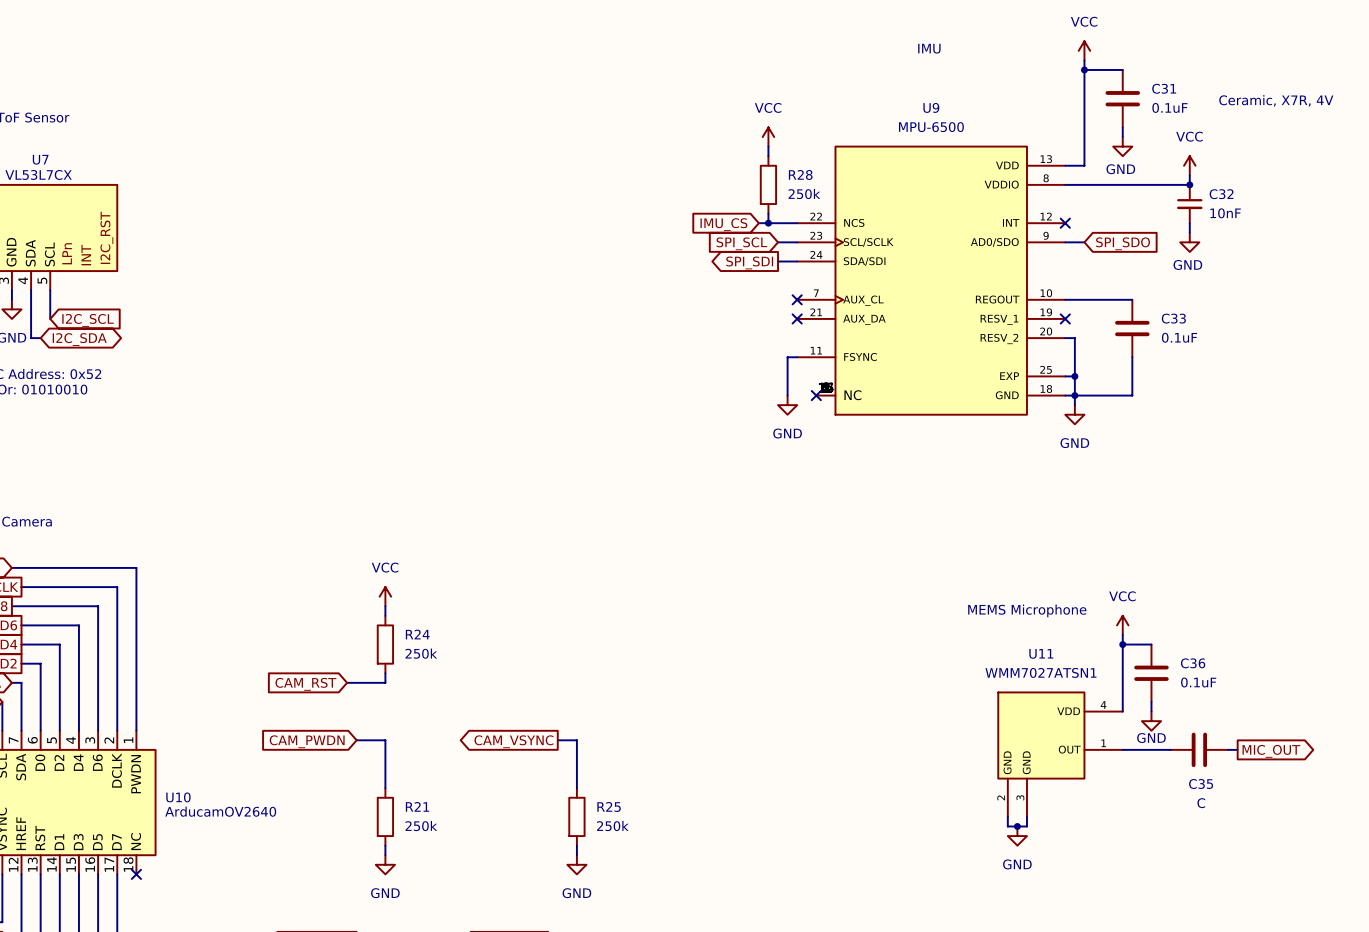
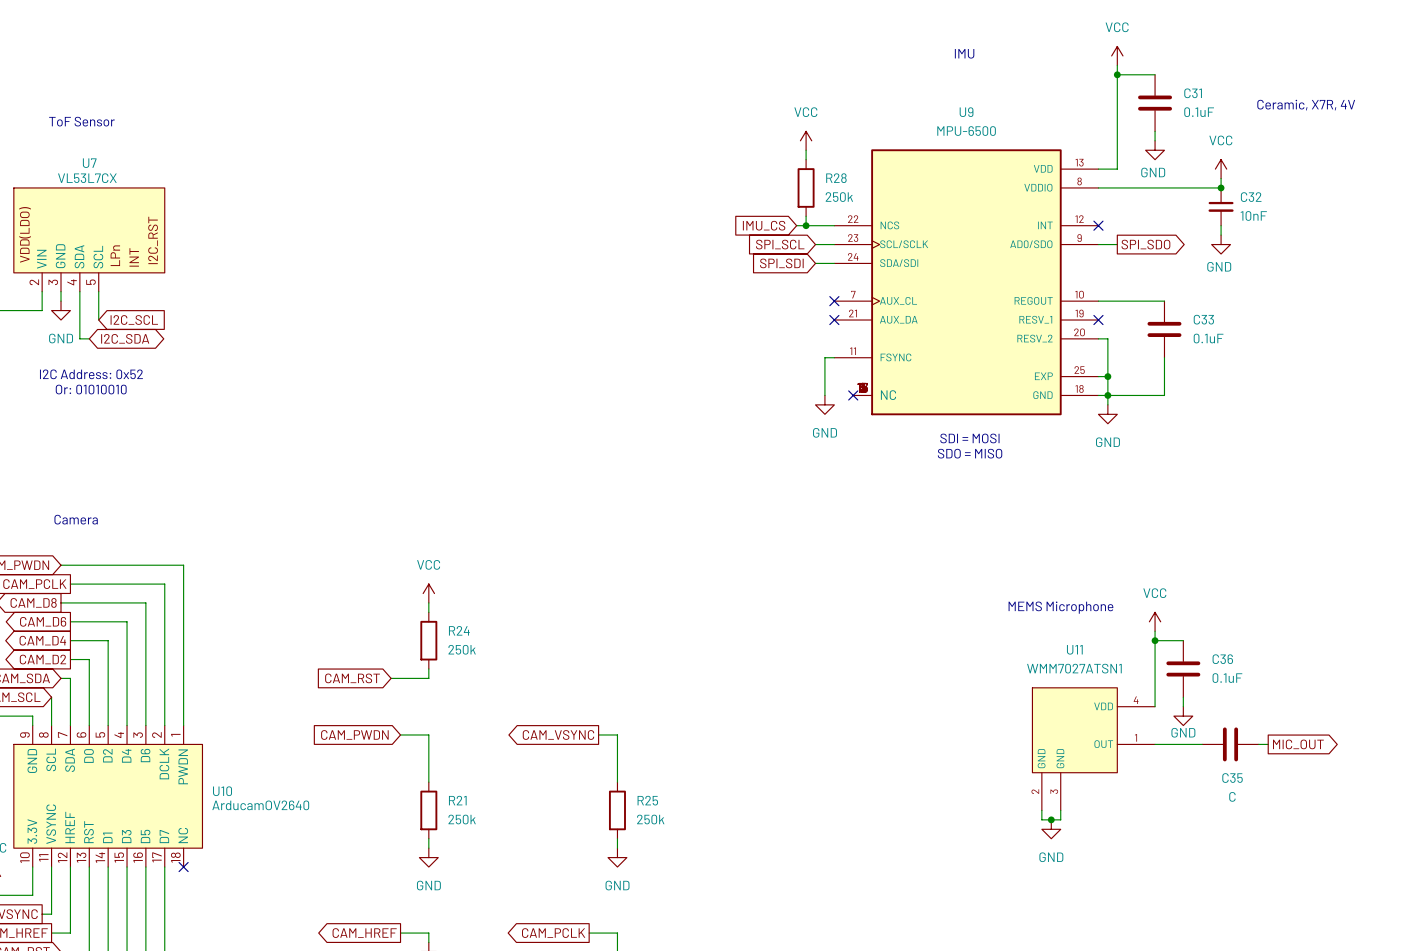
global label shape: input (1123, 243) -> output (1145, 244)
global label shape: output (749, 262) -> input (781, 263)
text: none -> SDI = MOSI (969, 438)
text: none -> SDO = MISO (970, 453)

